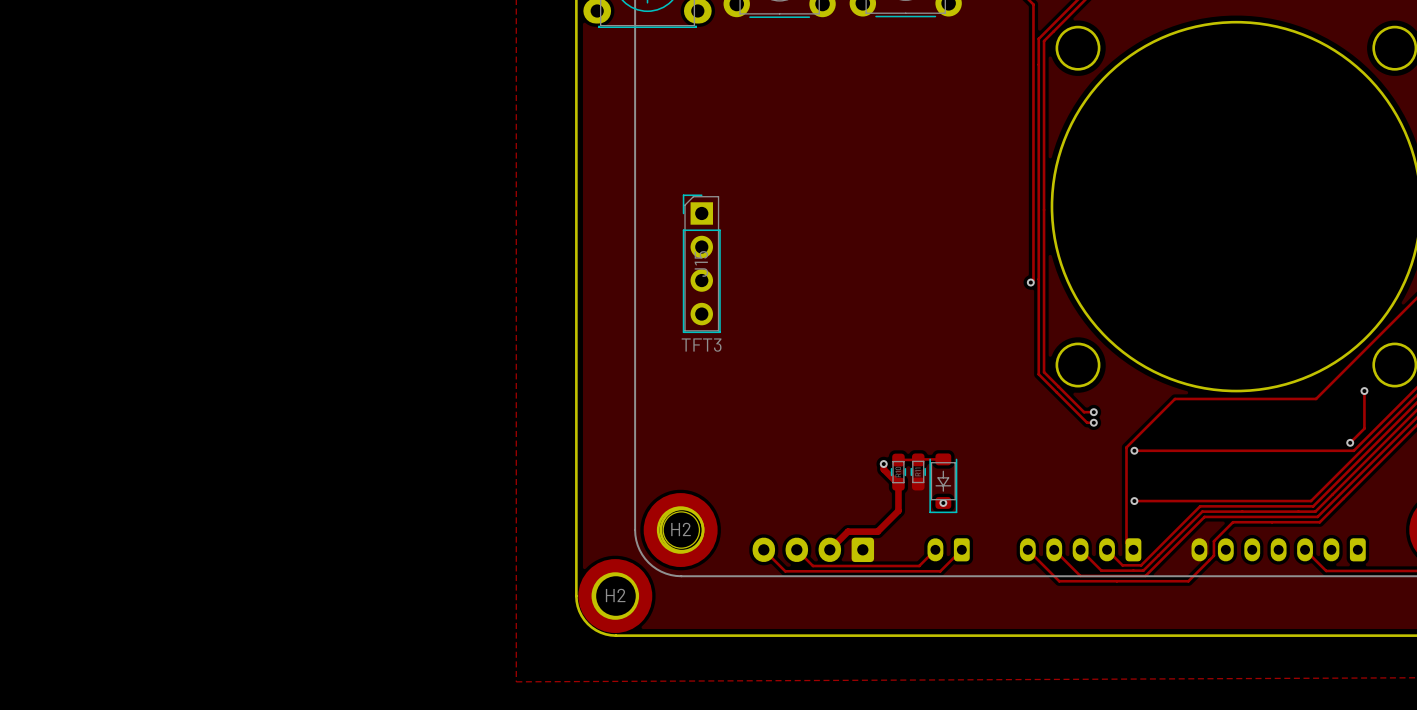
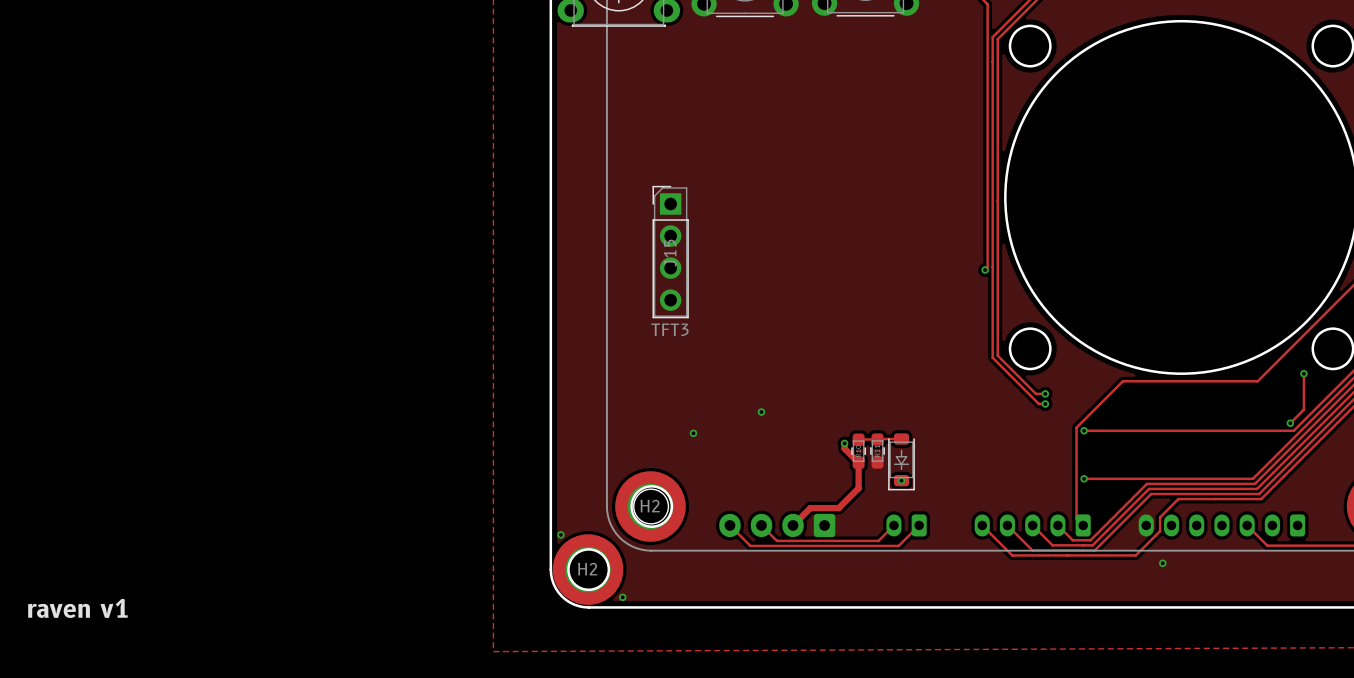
via: none -> (761, 412)
via: none -> (693, 433)
via: none -> (560, 534)
via: none -> (1162, 563)
via: none -> (622, 597)
text: none -> raven v1 (77, 608)

